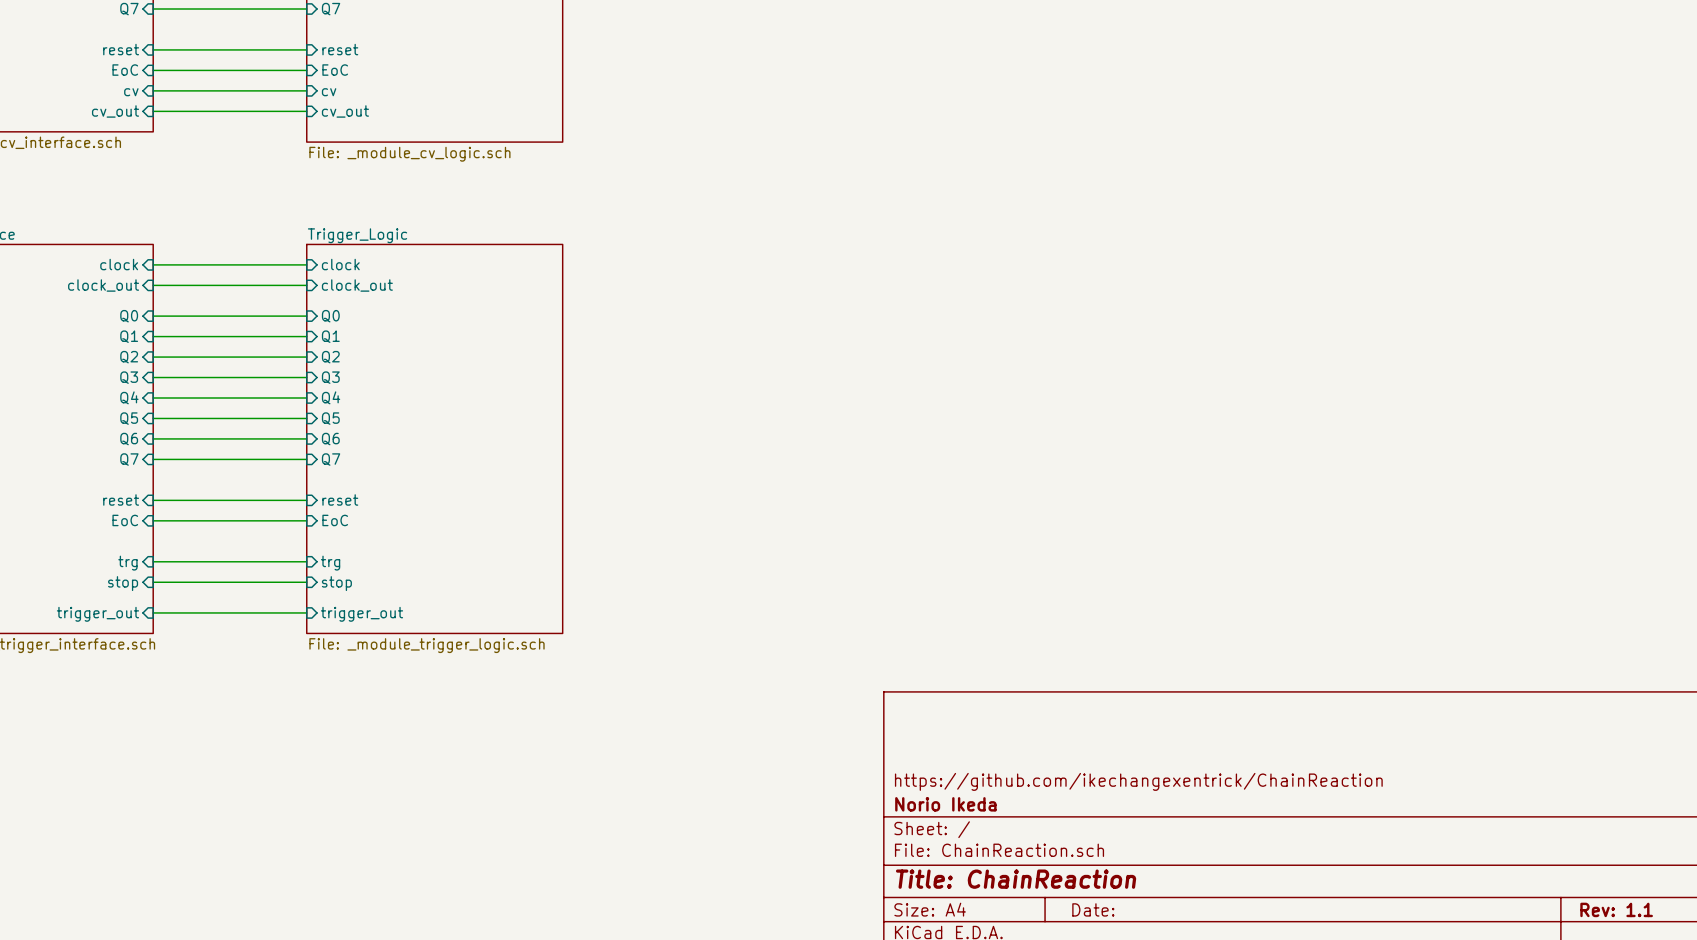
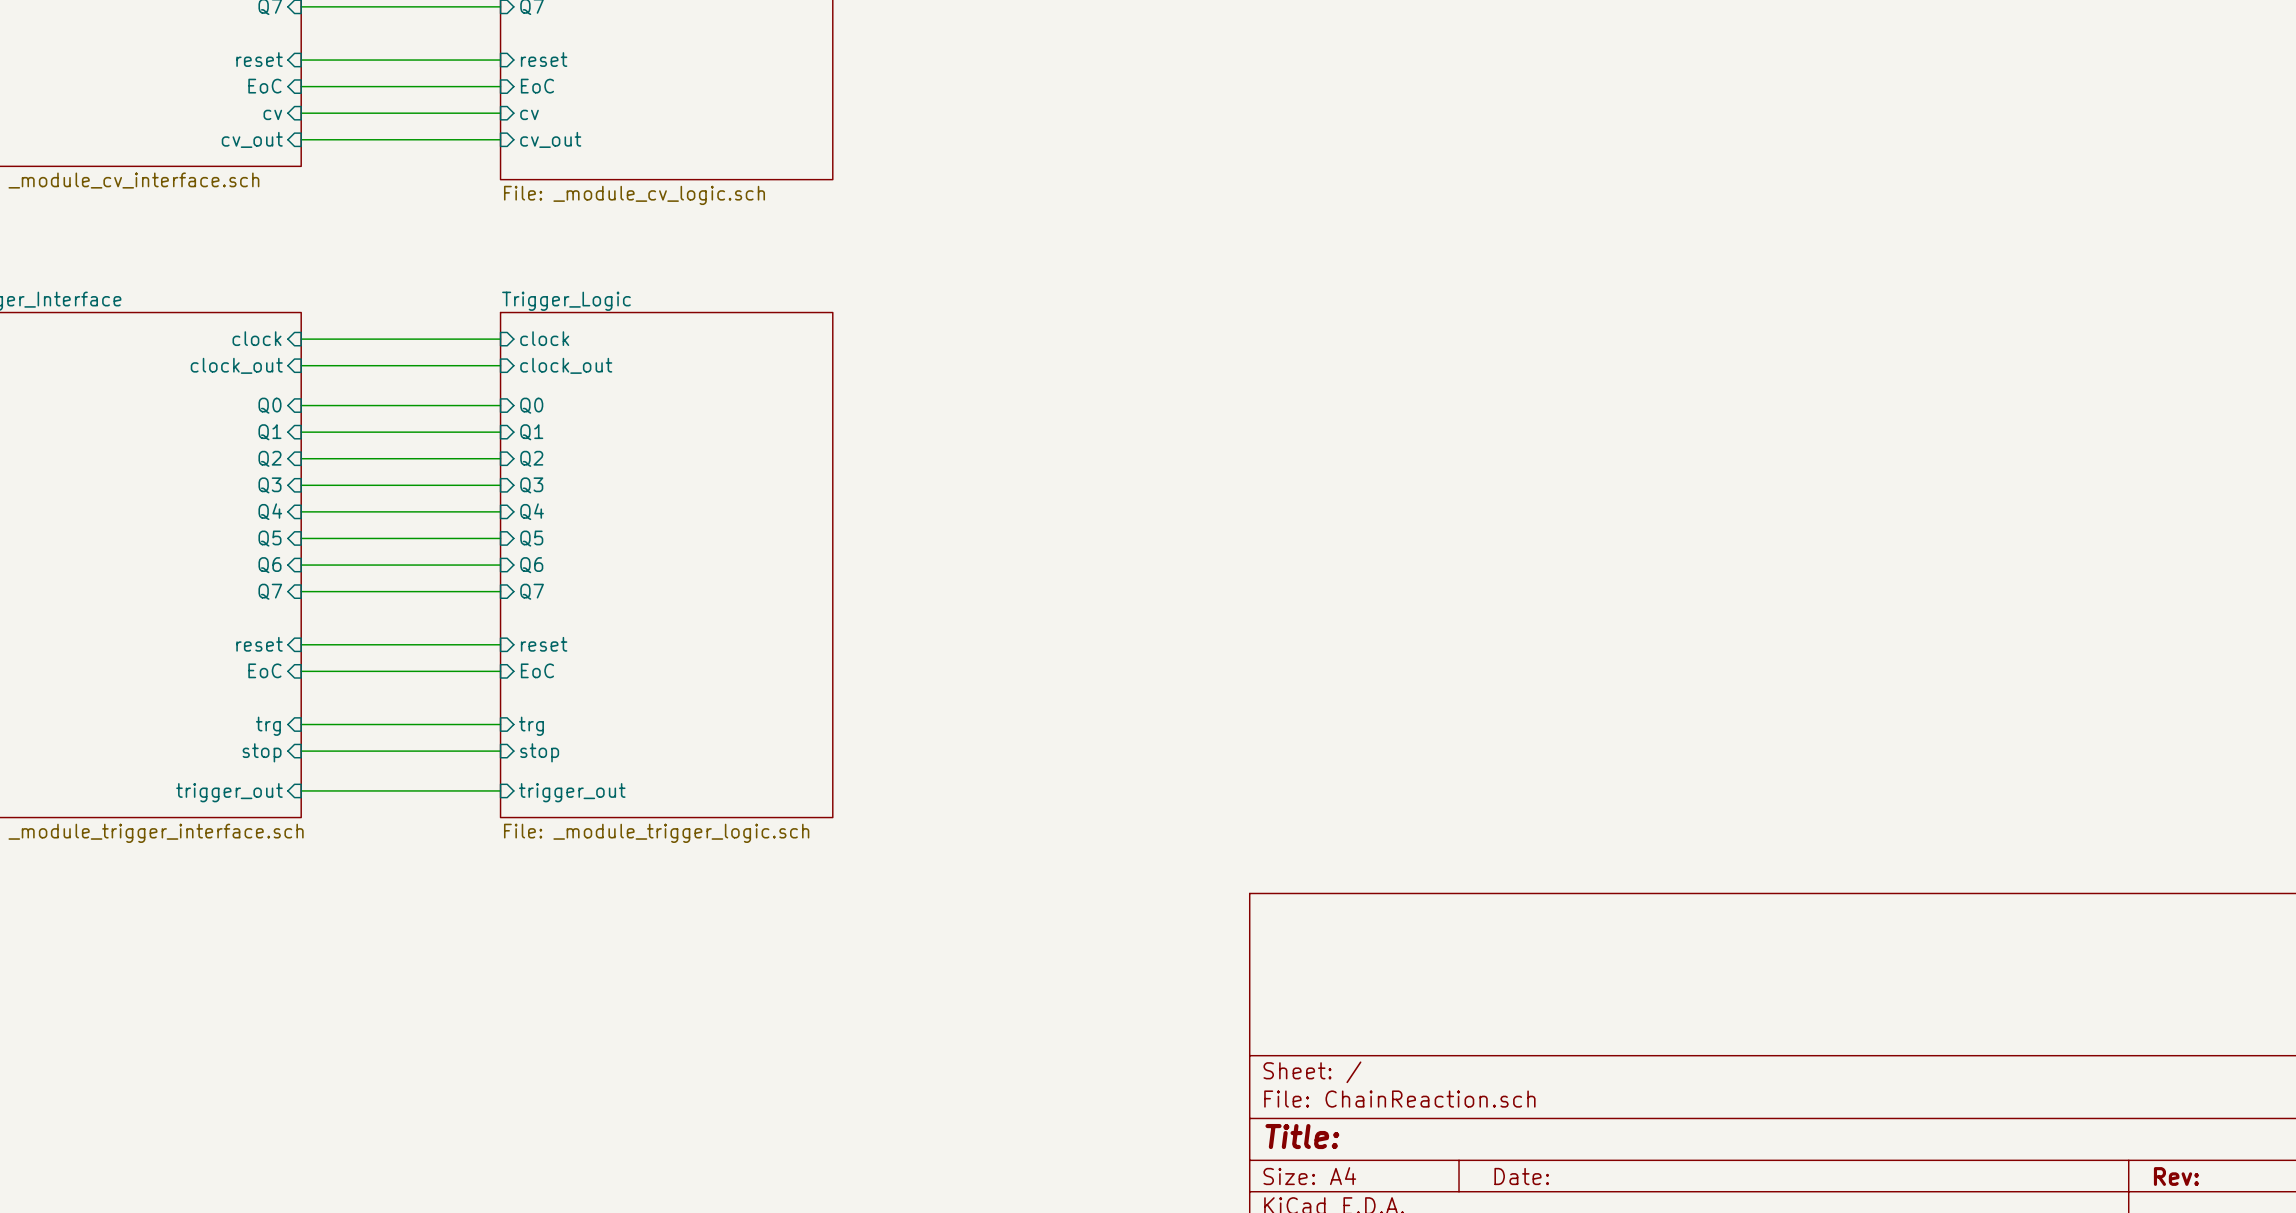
title block: https://github.com/ikechangexentrick/ChainReaction (1138, 781) -> none
title block: Norio Ikeda (945, 804) -> none
title block: Title: ChainReaction (1016, 879) -> Title: (1302, 1136)
title block: Rev: 1.1 (1616, 909) -> Rev: (2176, 1176)

